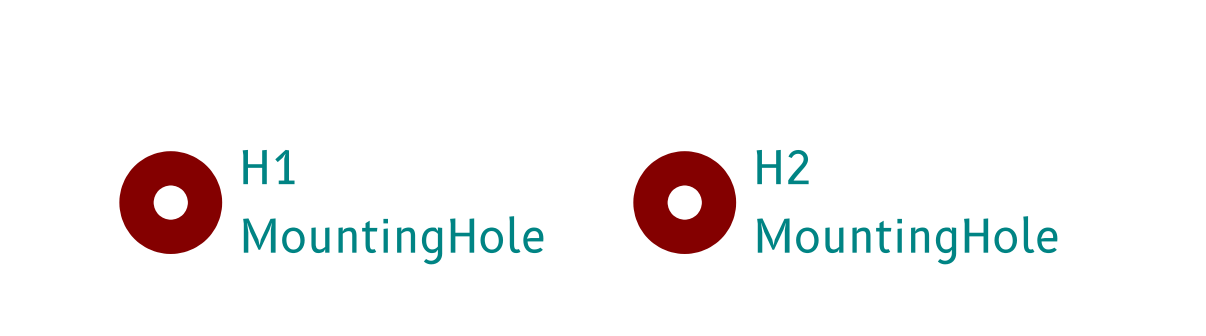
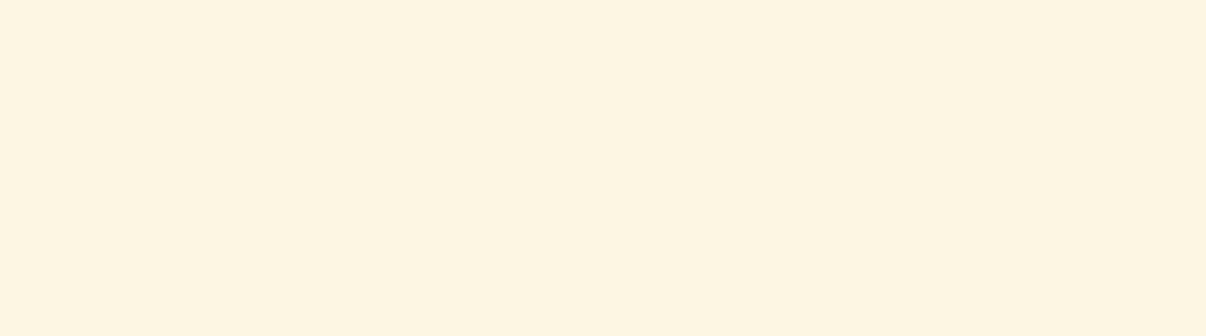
H1: MountingHole (170, 202) -> none
H2: MountingHole (684, 202) -> none

